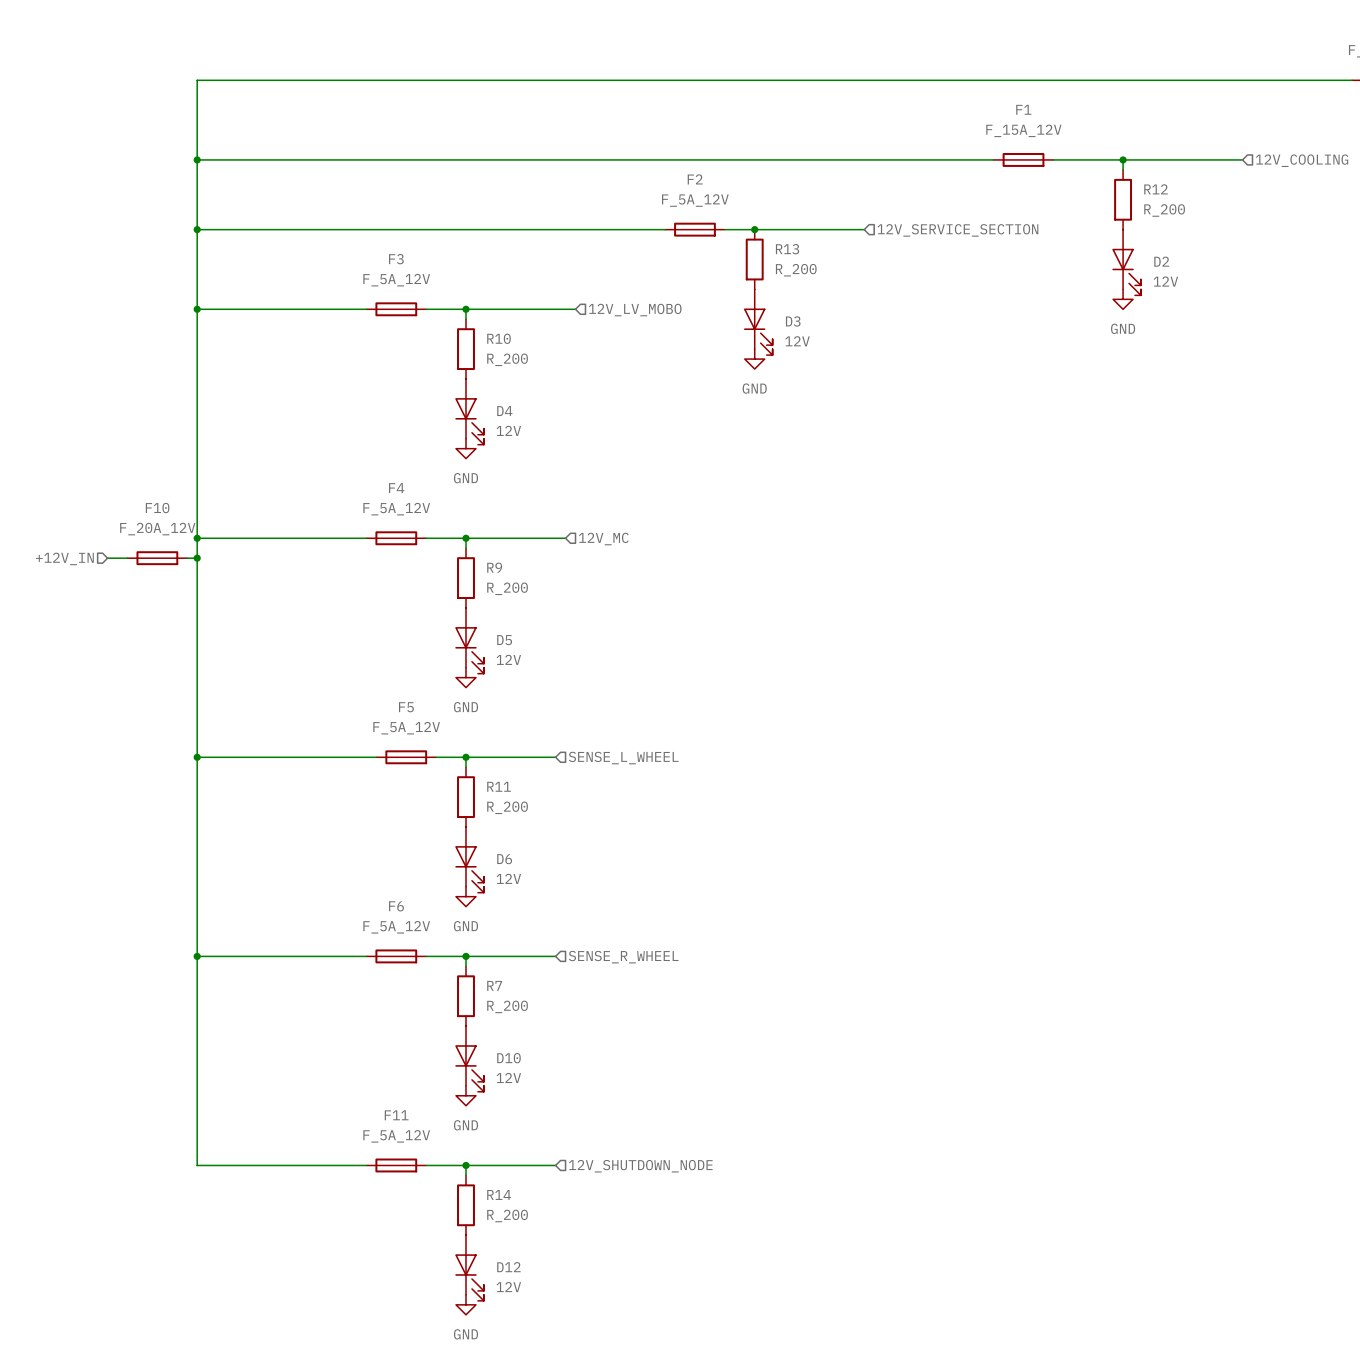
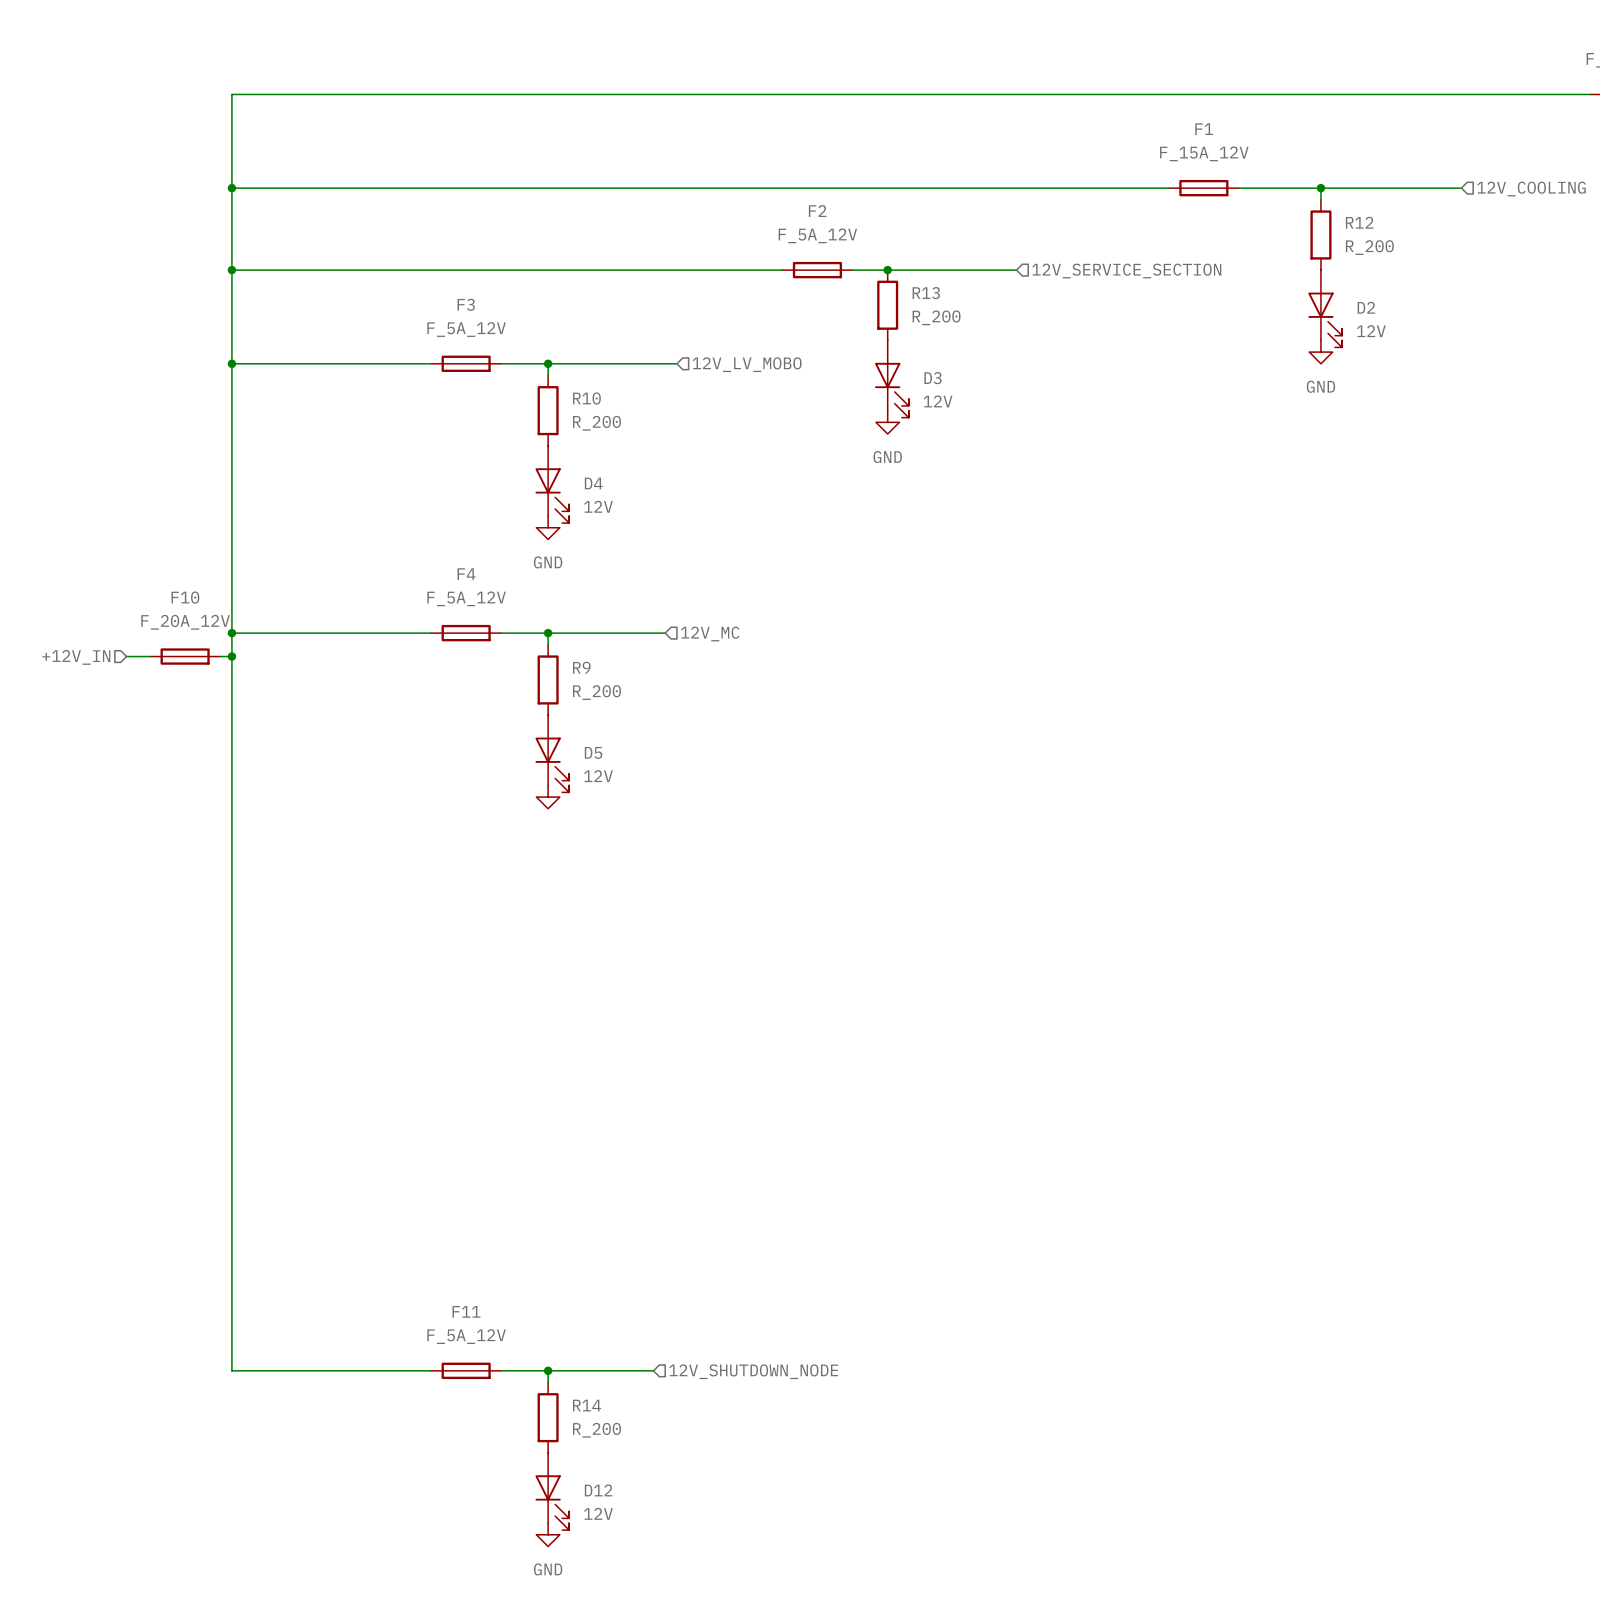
power symbol text: GND (465, 707) -> none
wire: (197, 757) (376, 757) -> none
junction: (197, 757) -> none
F5: F_5A_12V (406, 757) -> none
wire: (436, 757) (555, 757) -> none
wire: (465, 757) (465, 767) -> none
junction: (465, 757) -> none
hierarchical label: SENSE_L_WHEEL (623, 758) -> none
R11: R_200 (465, 797) -> none
D6: 12V (469, 859) -> none
power symbol: GND (465, 896) -> none
wire: (197, 956) (366, 956) -> none
junction: (197, 956) -> none
F6: F_5A_12V (396, 956) -> none
wire: (426, 956) (555, 956) -> none
wire: (465, 956) (465, 966) -> none
junction: (465, 956) -> none
hierarchical label: SENSE_R_WHEEL (623, 957) -> none
R7: R_200 (465, 996) -> none
D10: 12V (469, 1058) -> none
power symbol: GND (465, 1095) -> none

